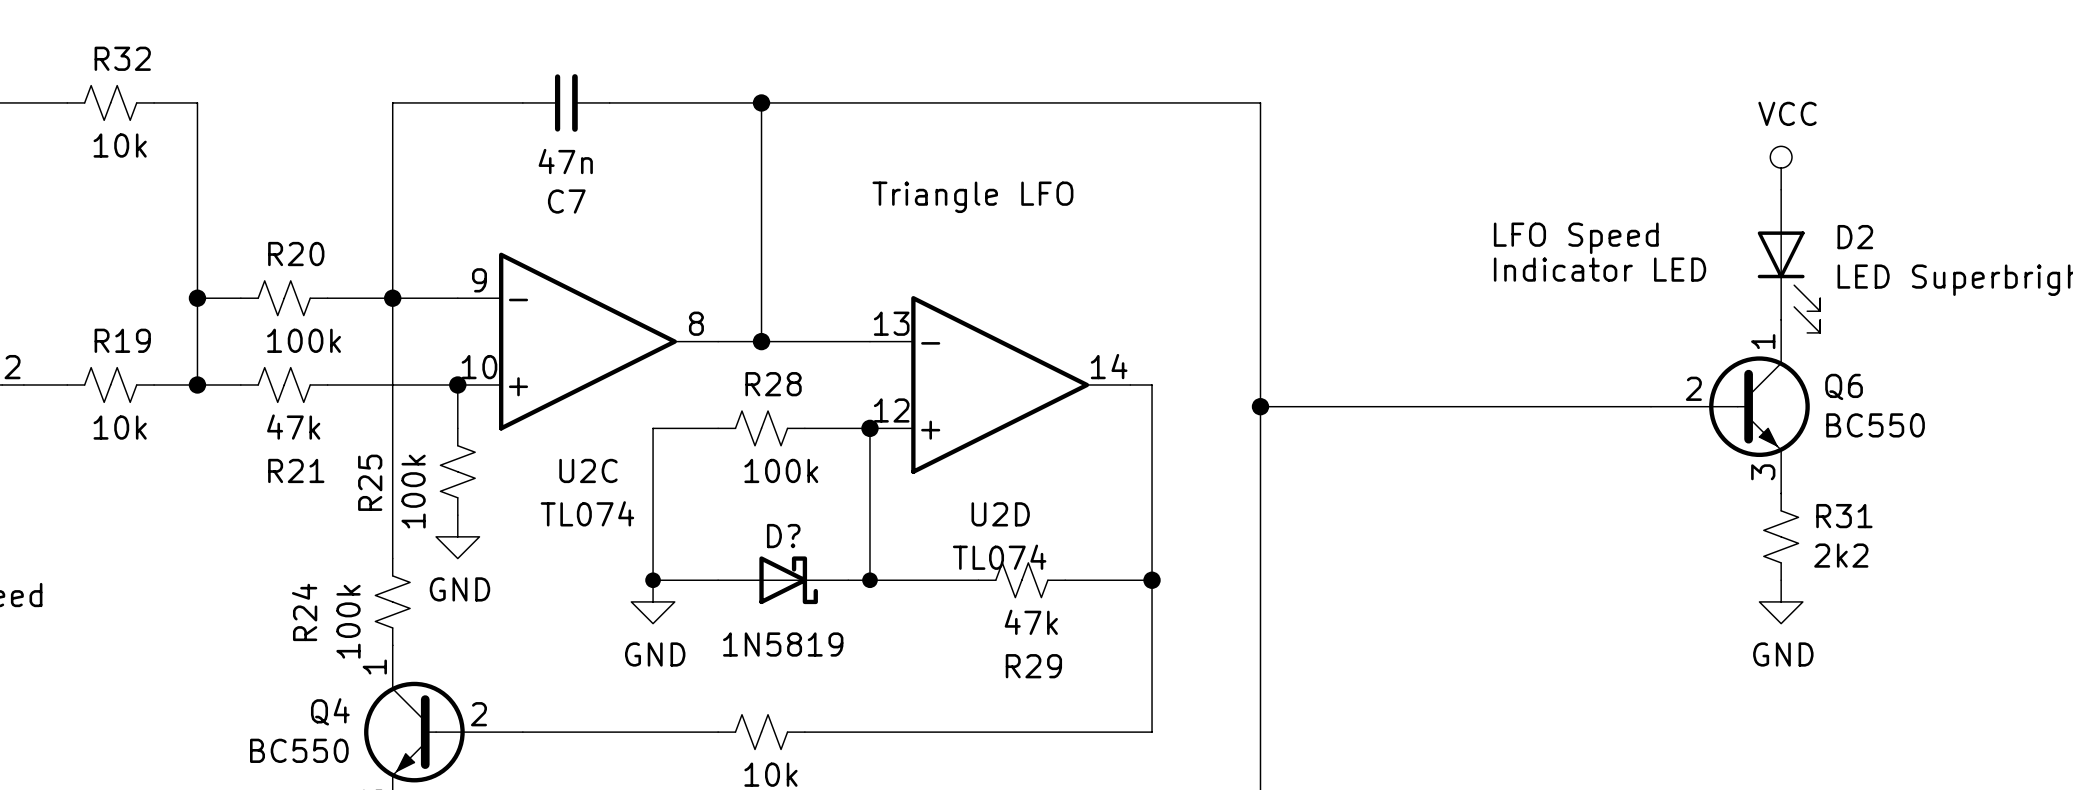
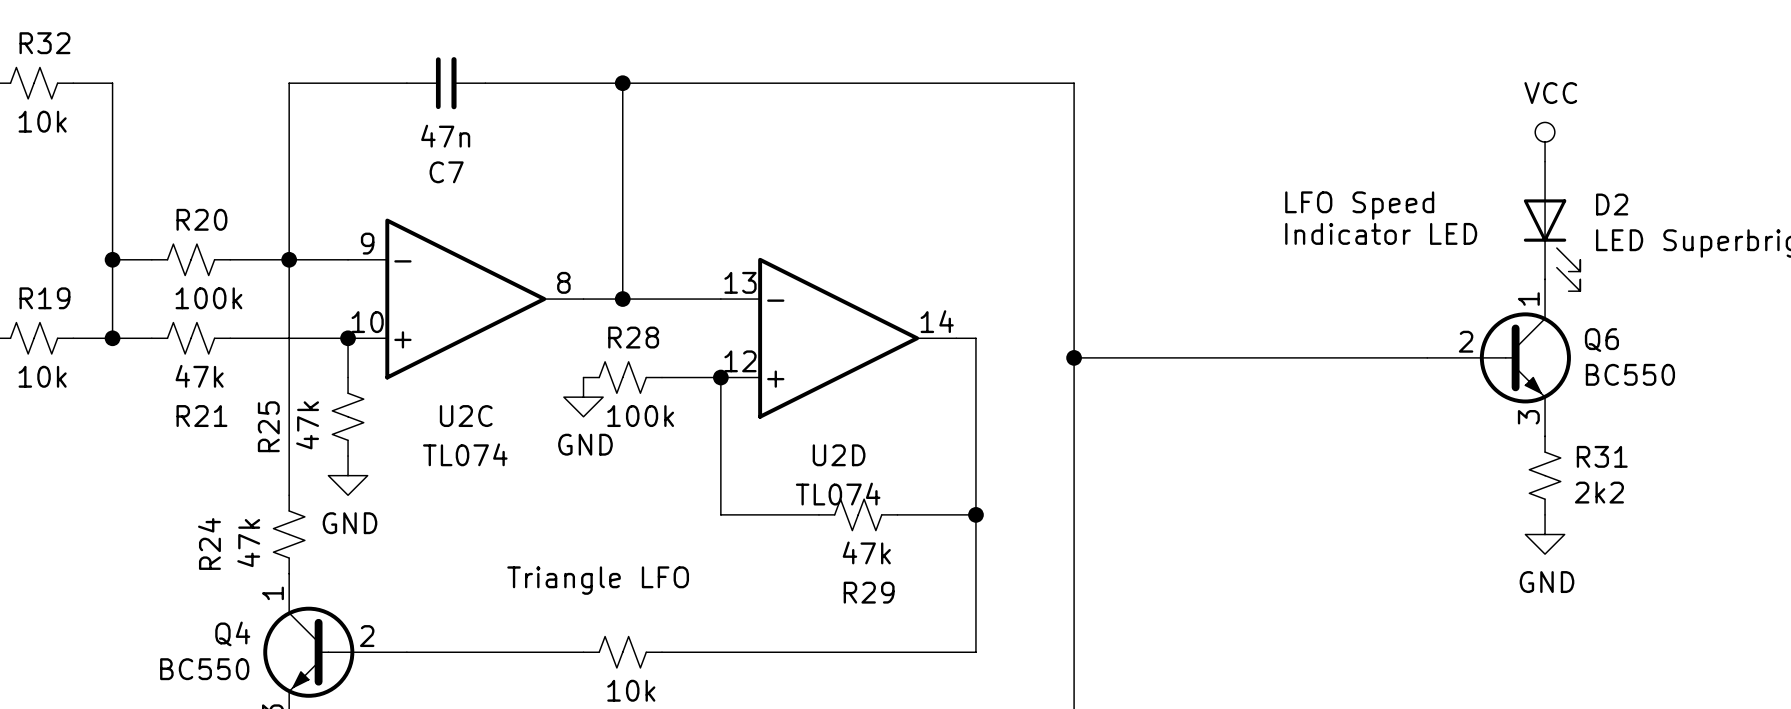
text: Triangle LFO (972, 197) -> none
wire: (718, 428) (653, 428) (653, 580) (718, 580) -> none
R25 value: 100k (413, 491) -> 47k (307, 425)
junction: (653, 580) -> none
D?: 1N5819 (783, 580) -> none
wire: (848, 580) (869, 580) -> none
junction: (869, 580) -> none
power symbol position: GND (653, 601) -> GND (583, 397)
R24 value: 100k (348, 621) -> 47k (248, 543)
text: none -> Triangle LFO (598, 580)

